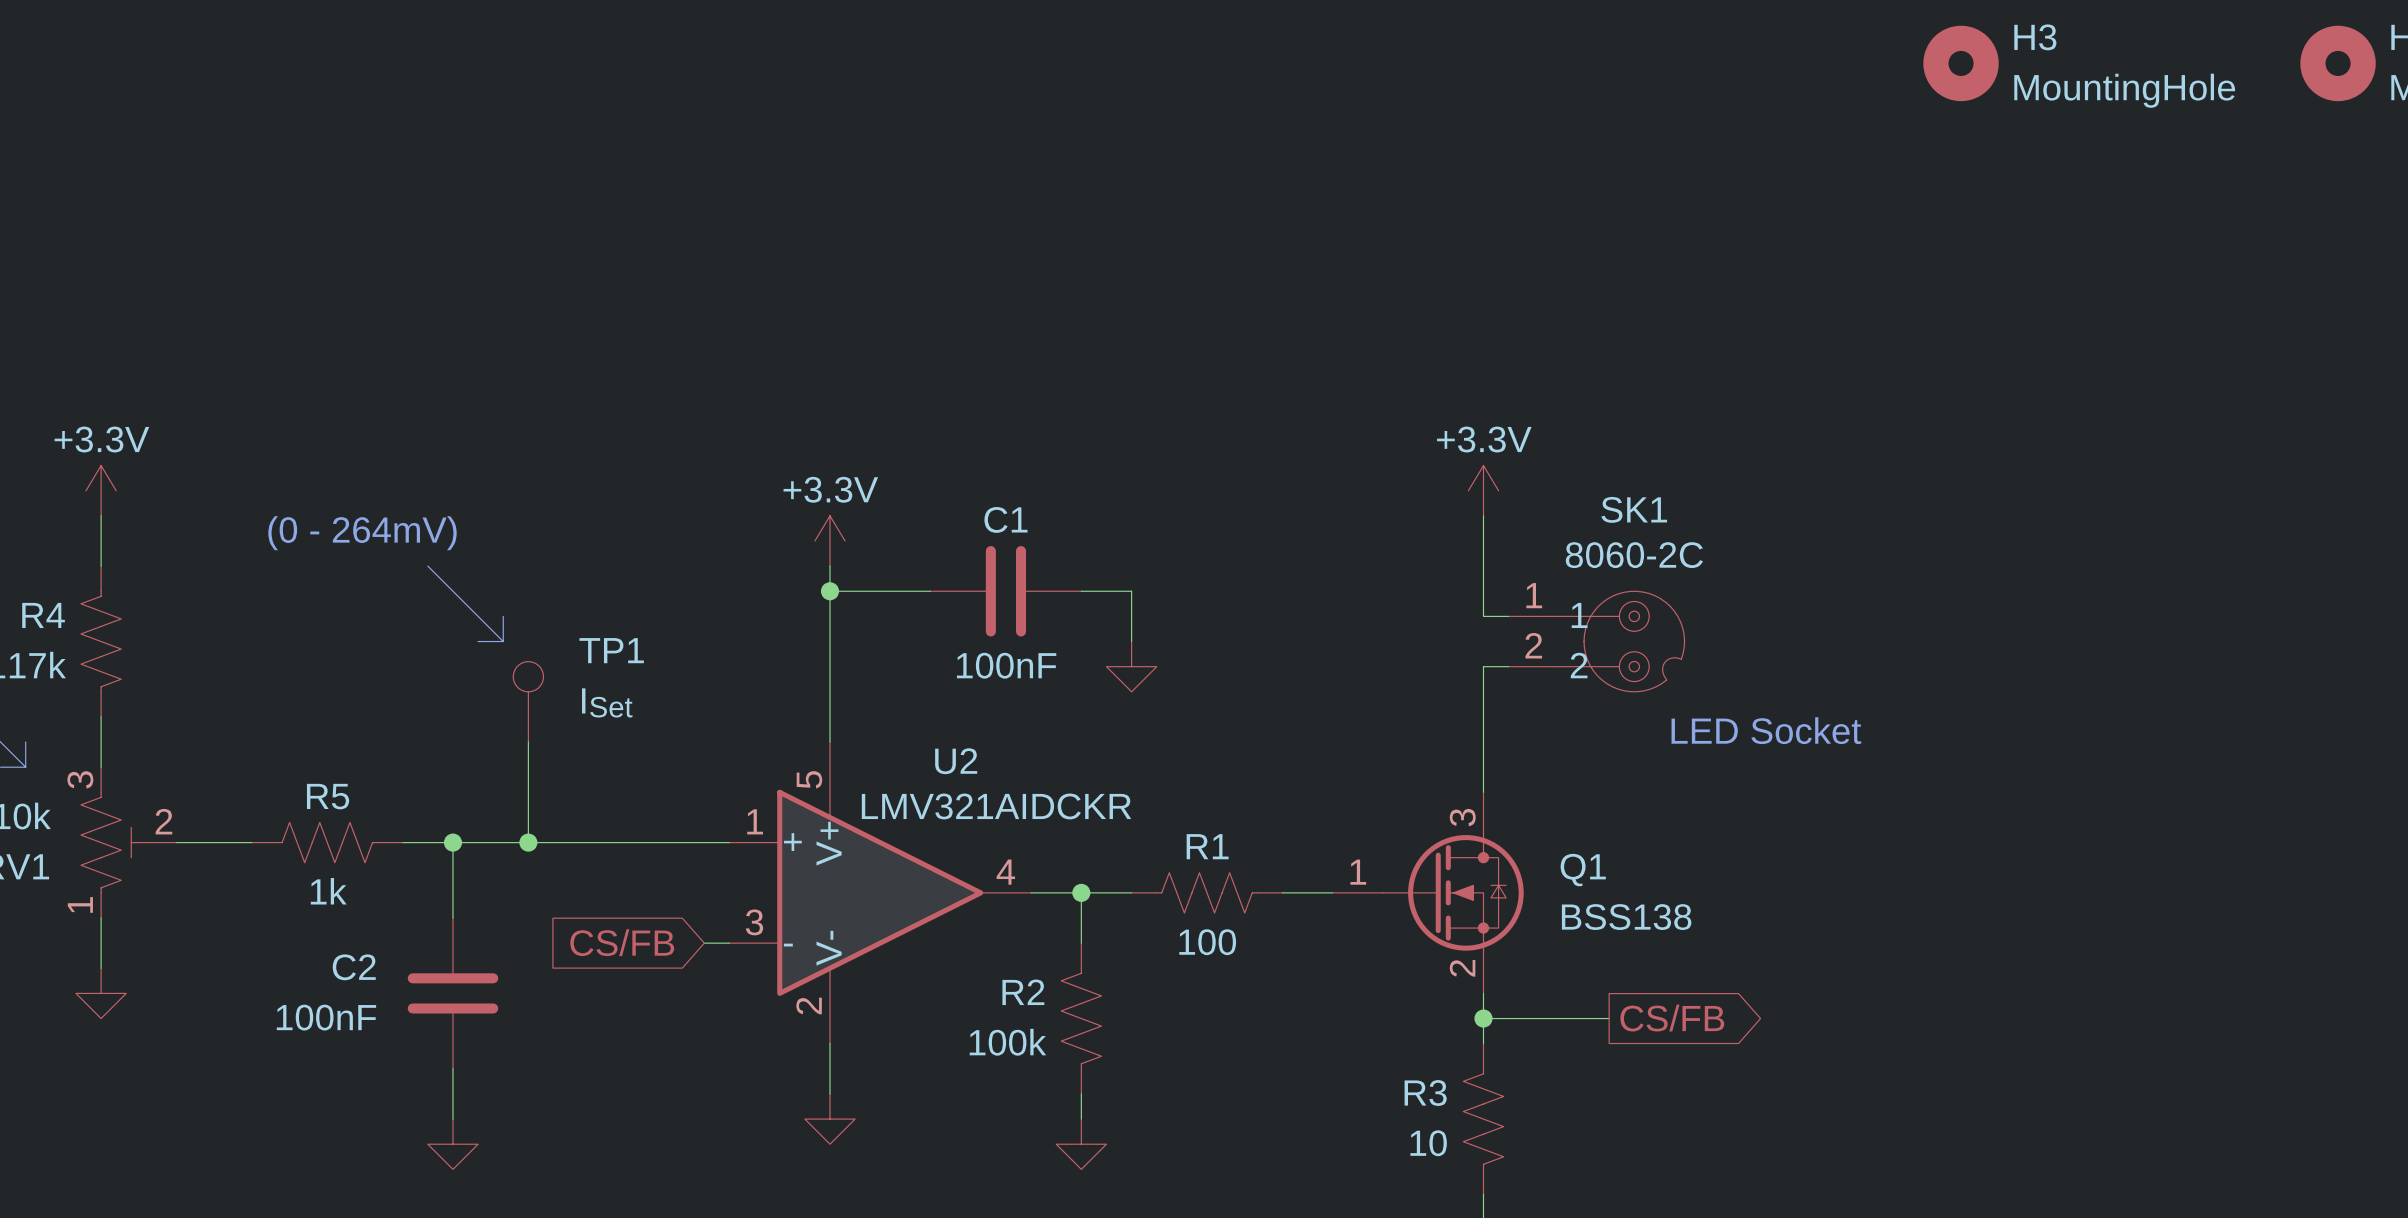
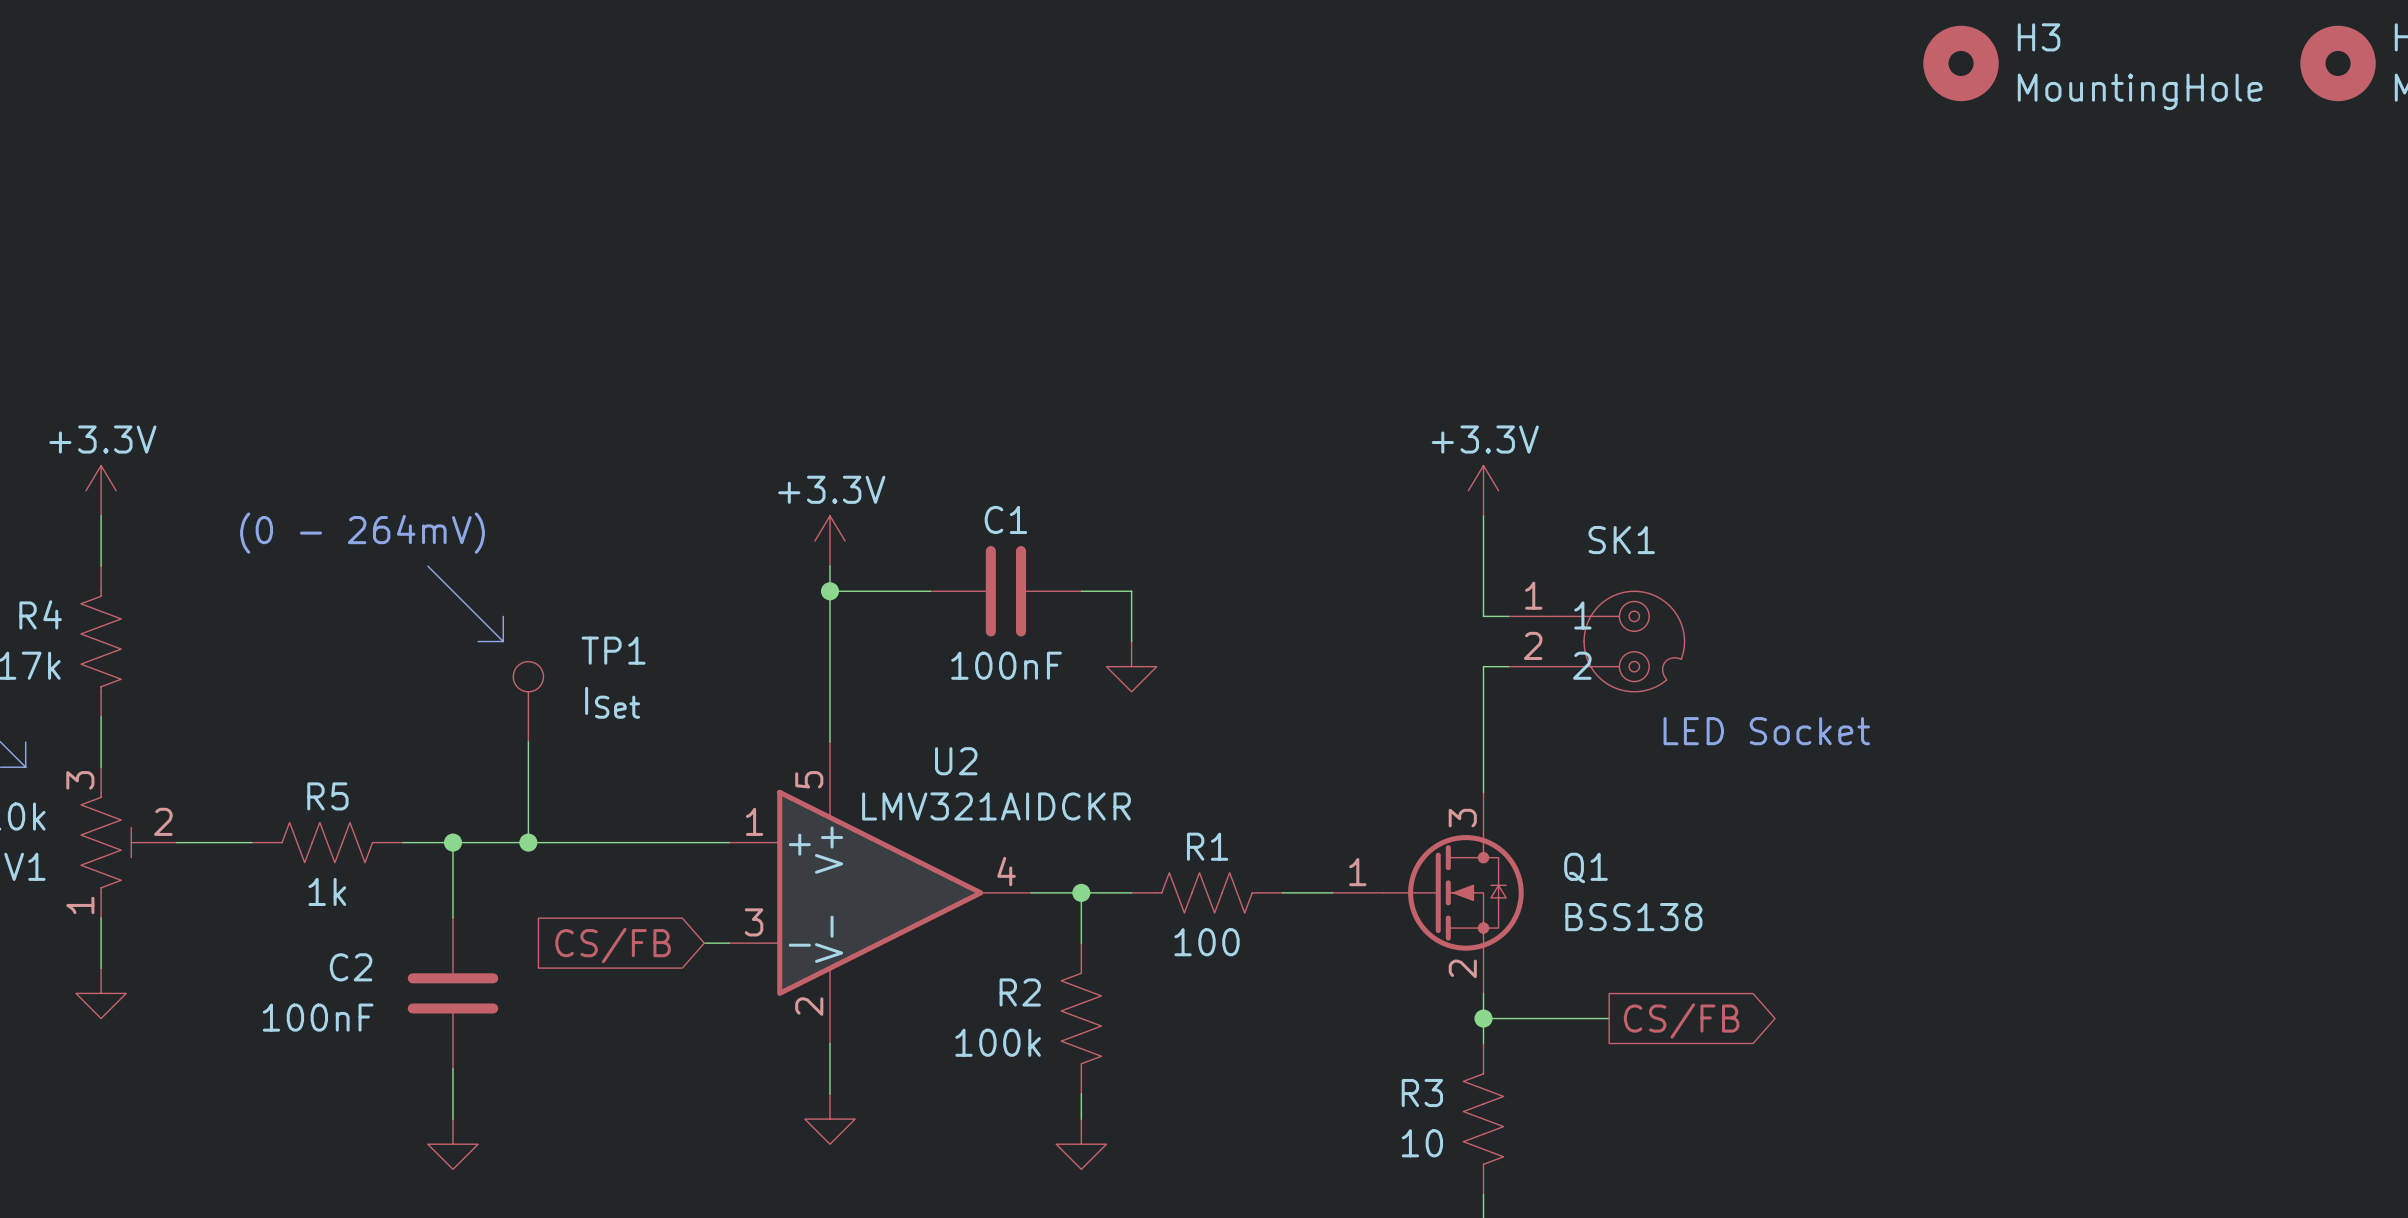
SK1 name position: SK1 (1634, 509) -> SK1 (1621, 540)
SK1 value: 8060-2C (1634, 555) -> none

